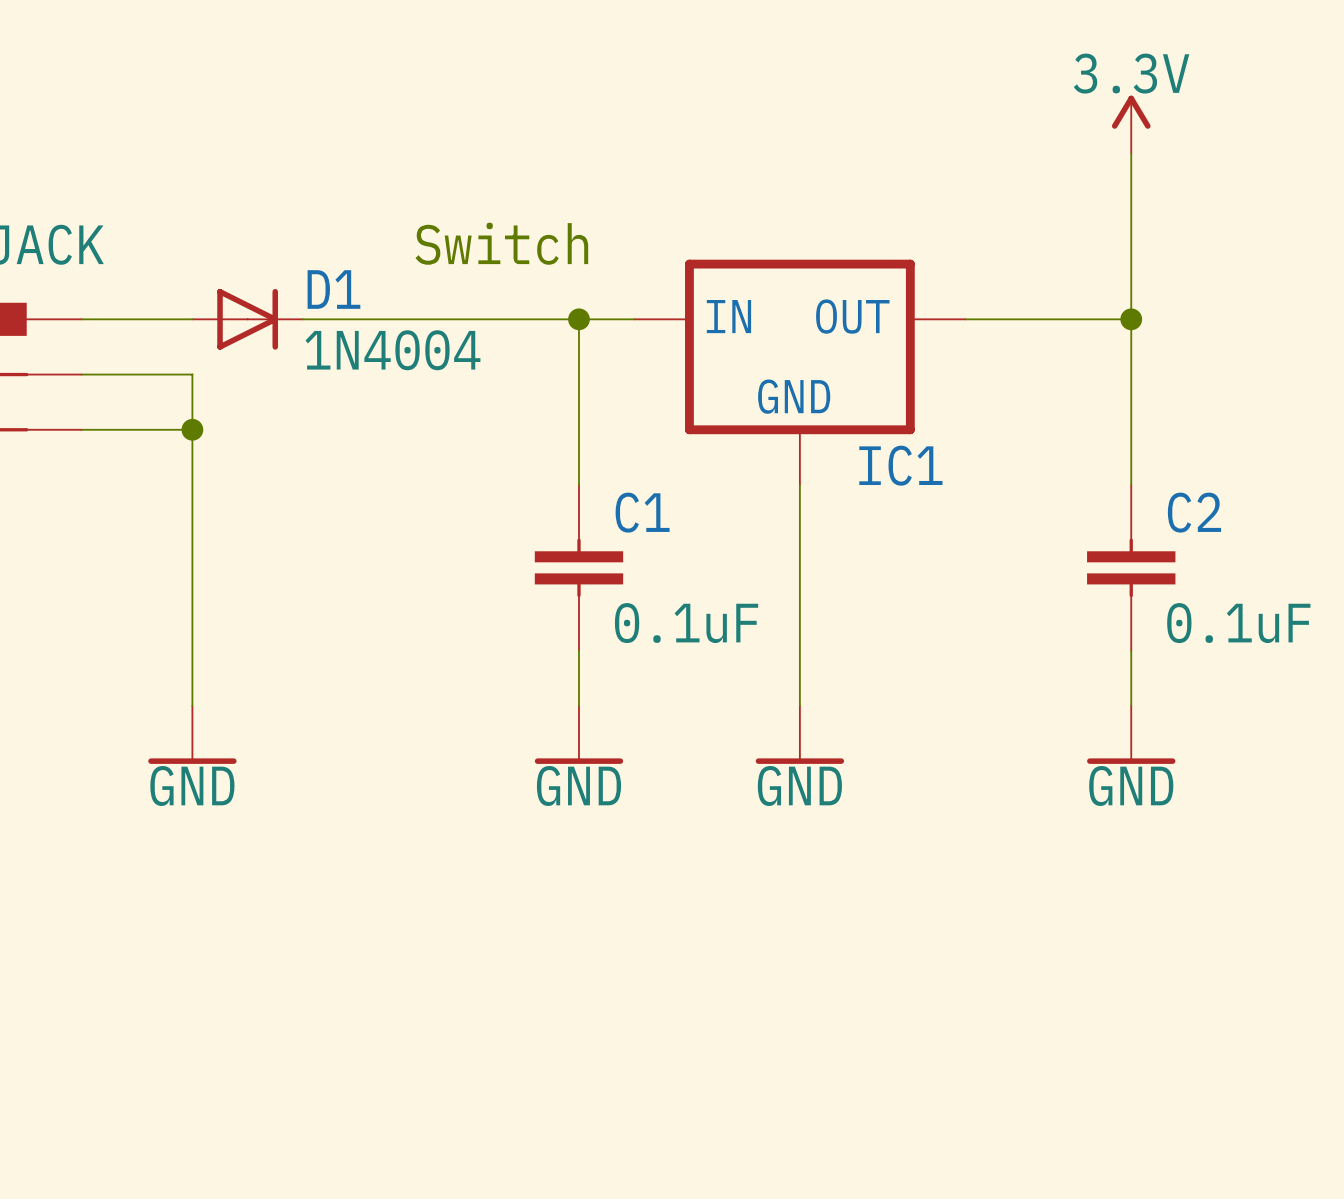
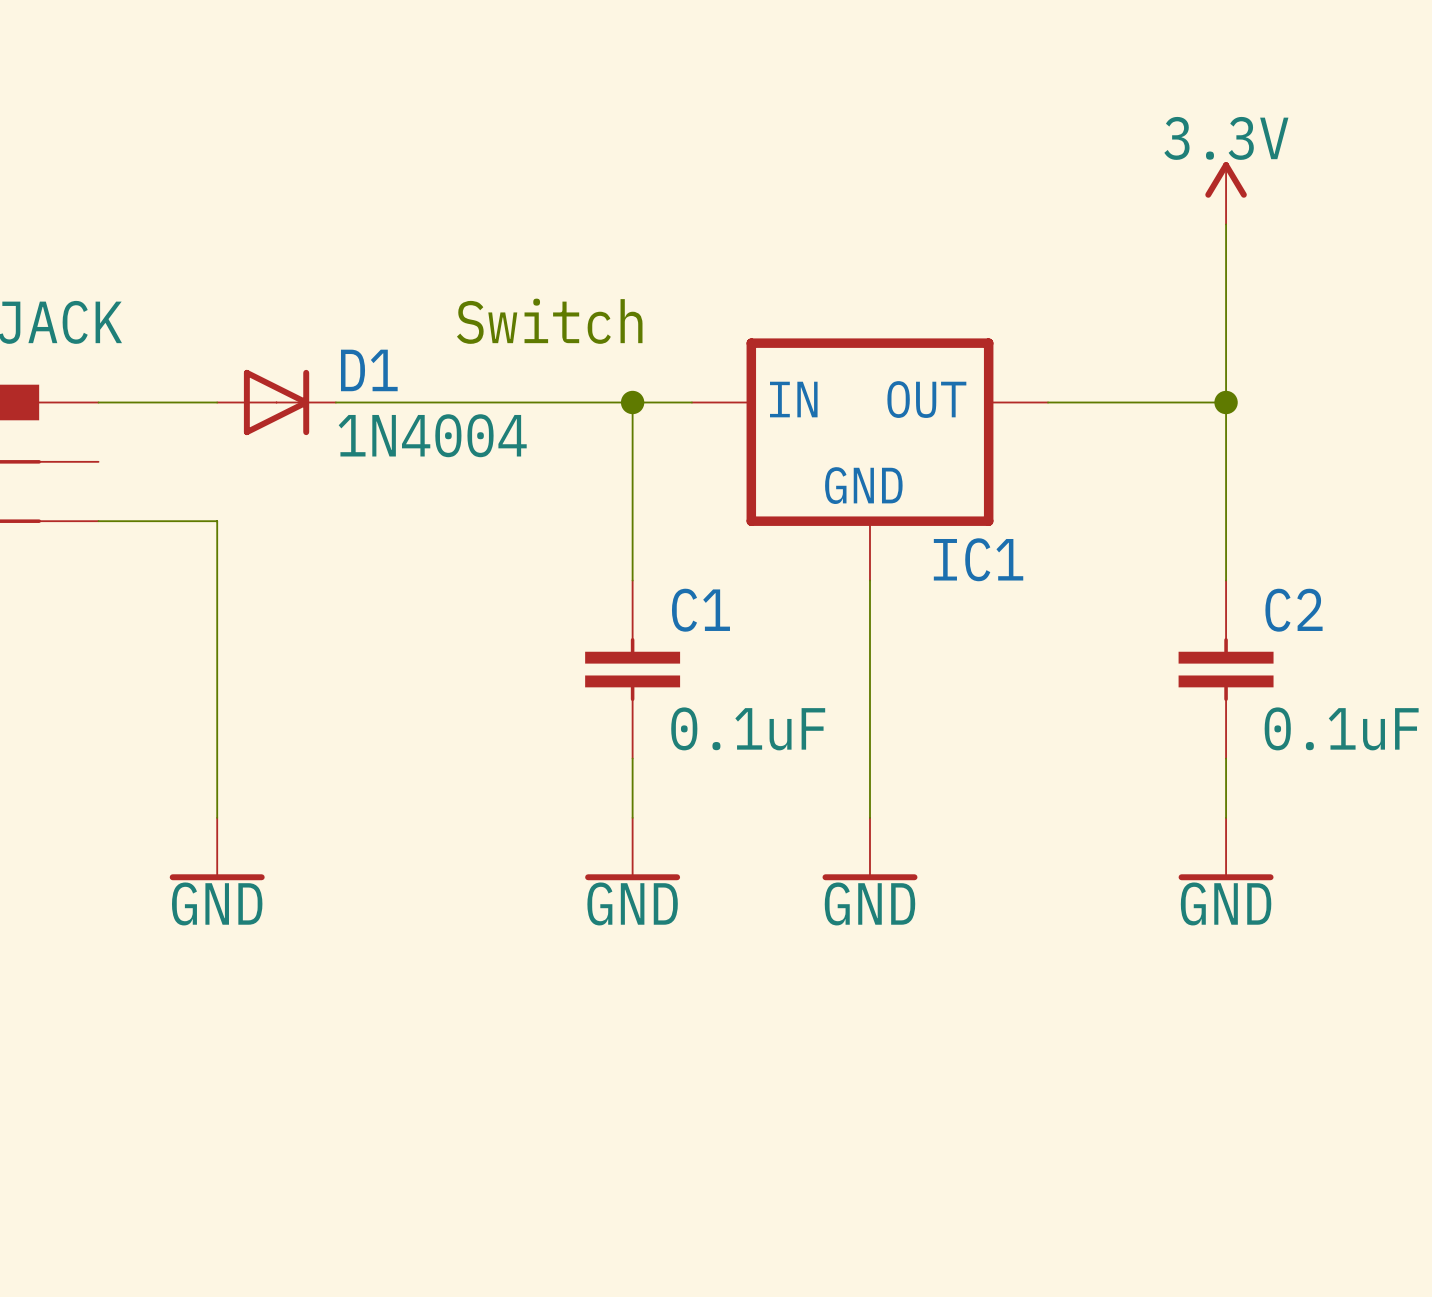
wire: (81, 374) (192, 374) (192, 429) -> none
junction: (192, 429) -> none

